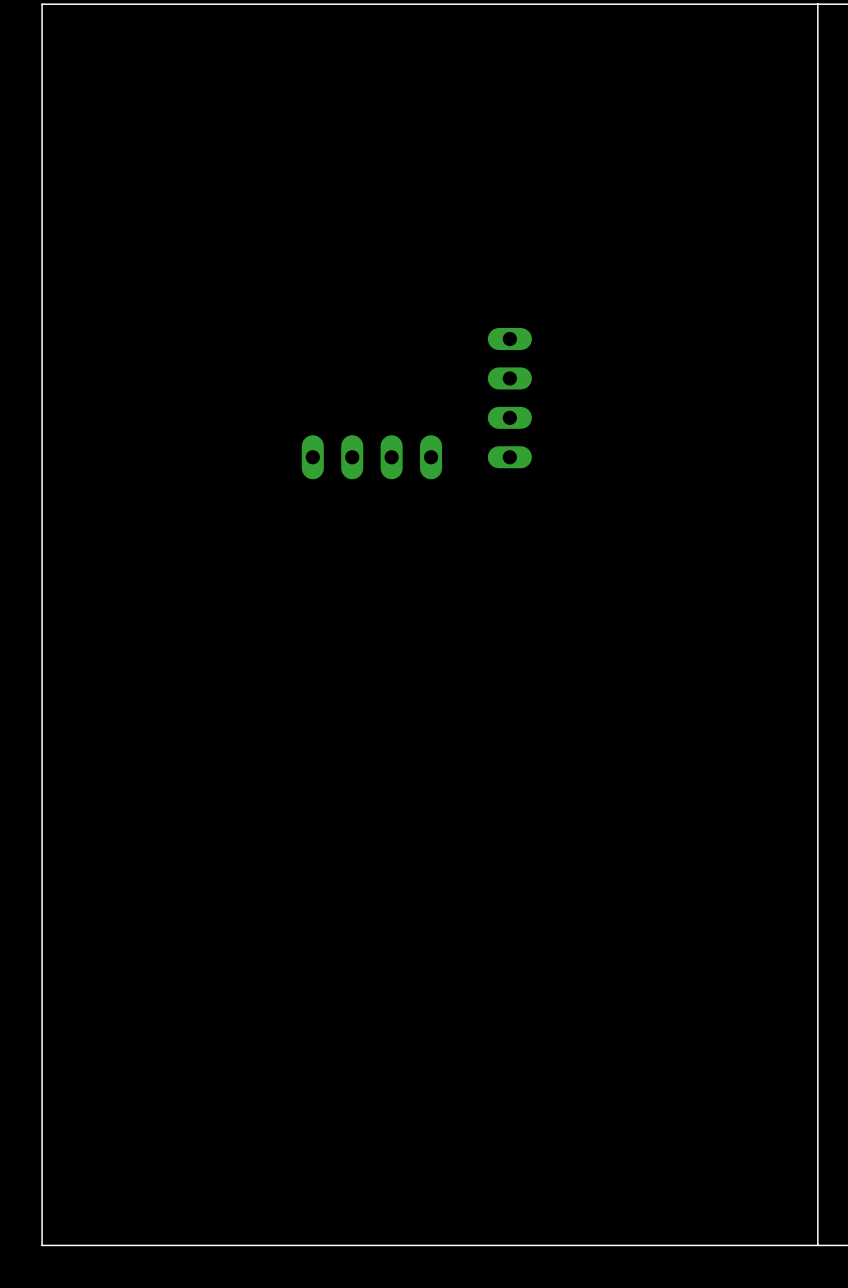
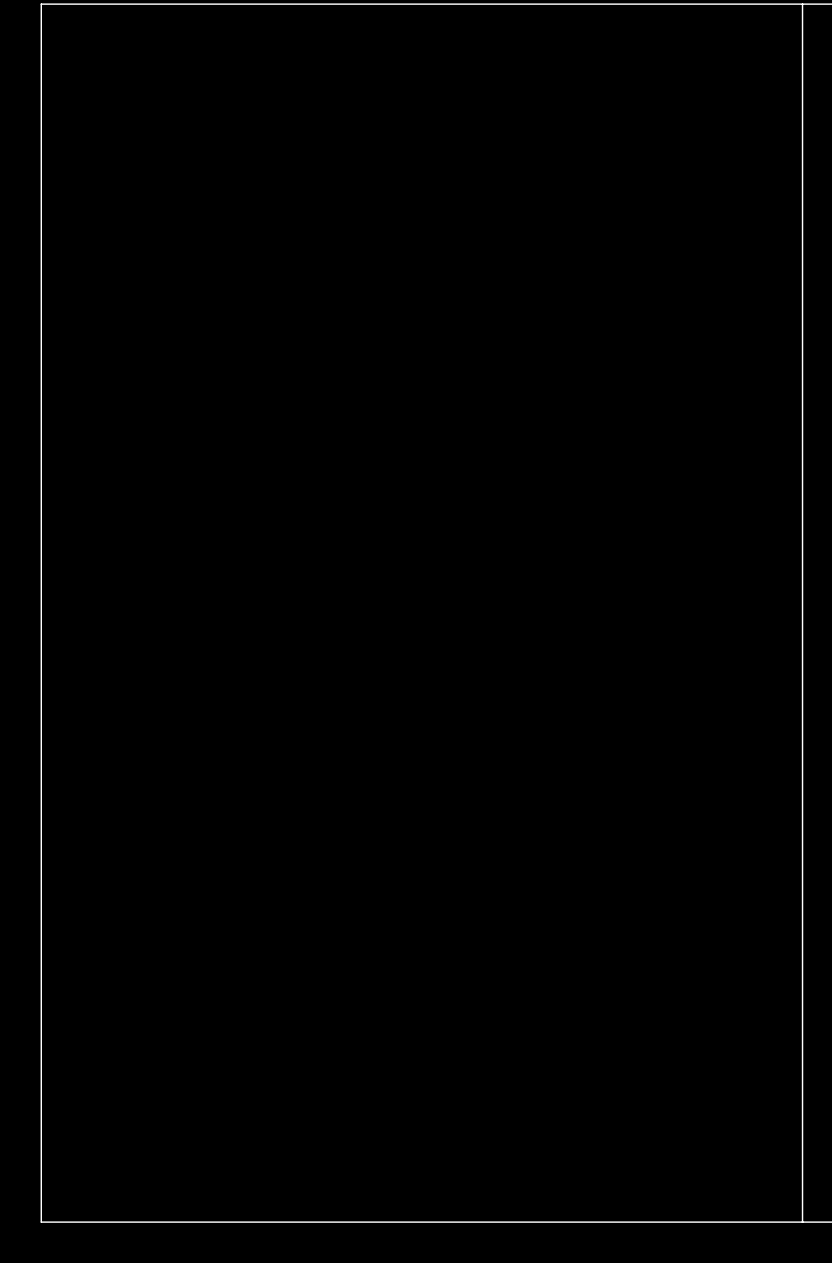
part: (509, 398) -> none
part: (371, 457) -> none

